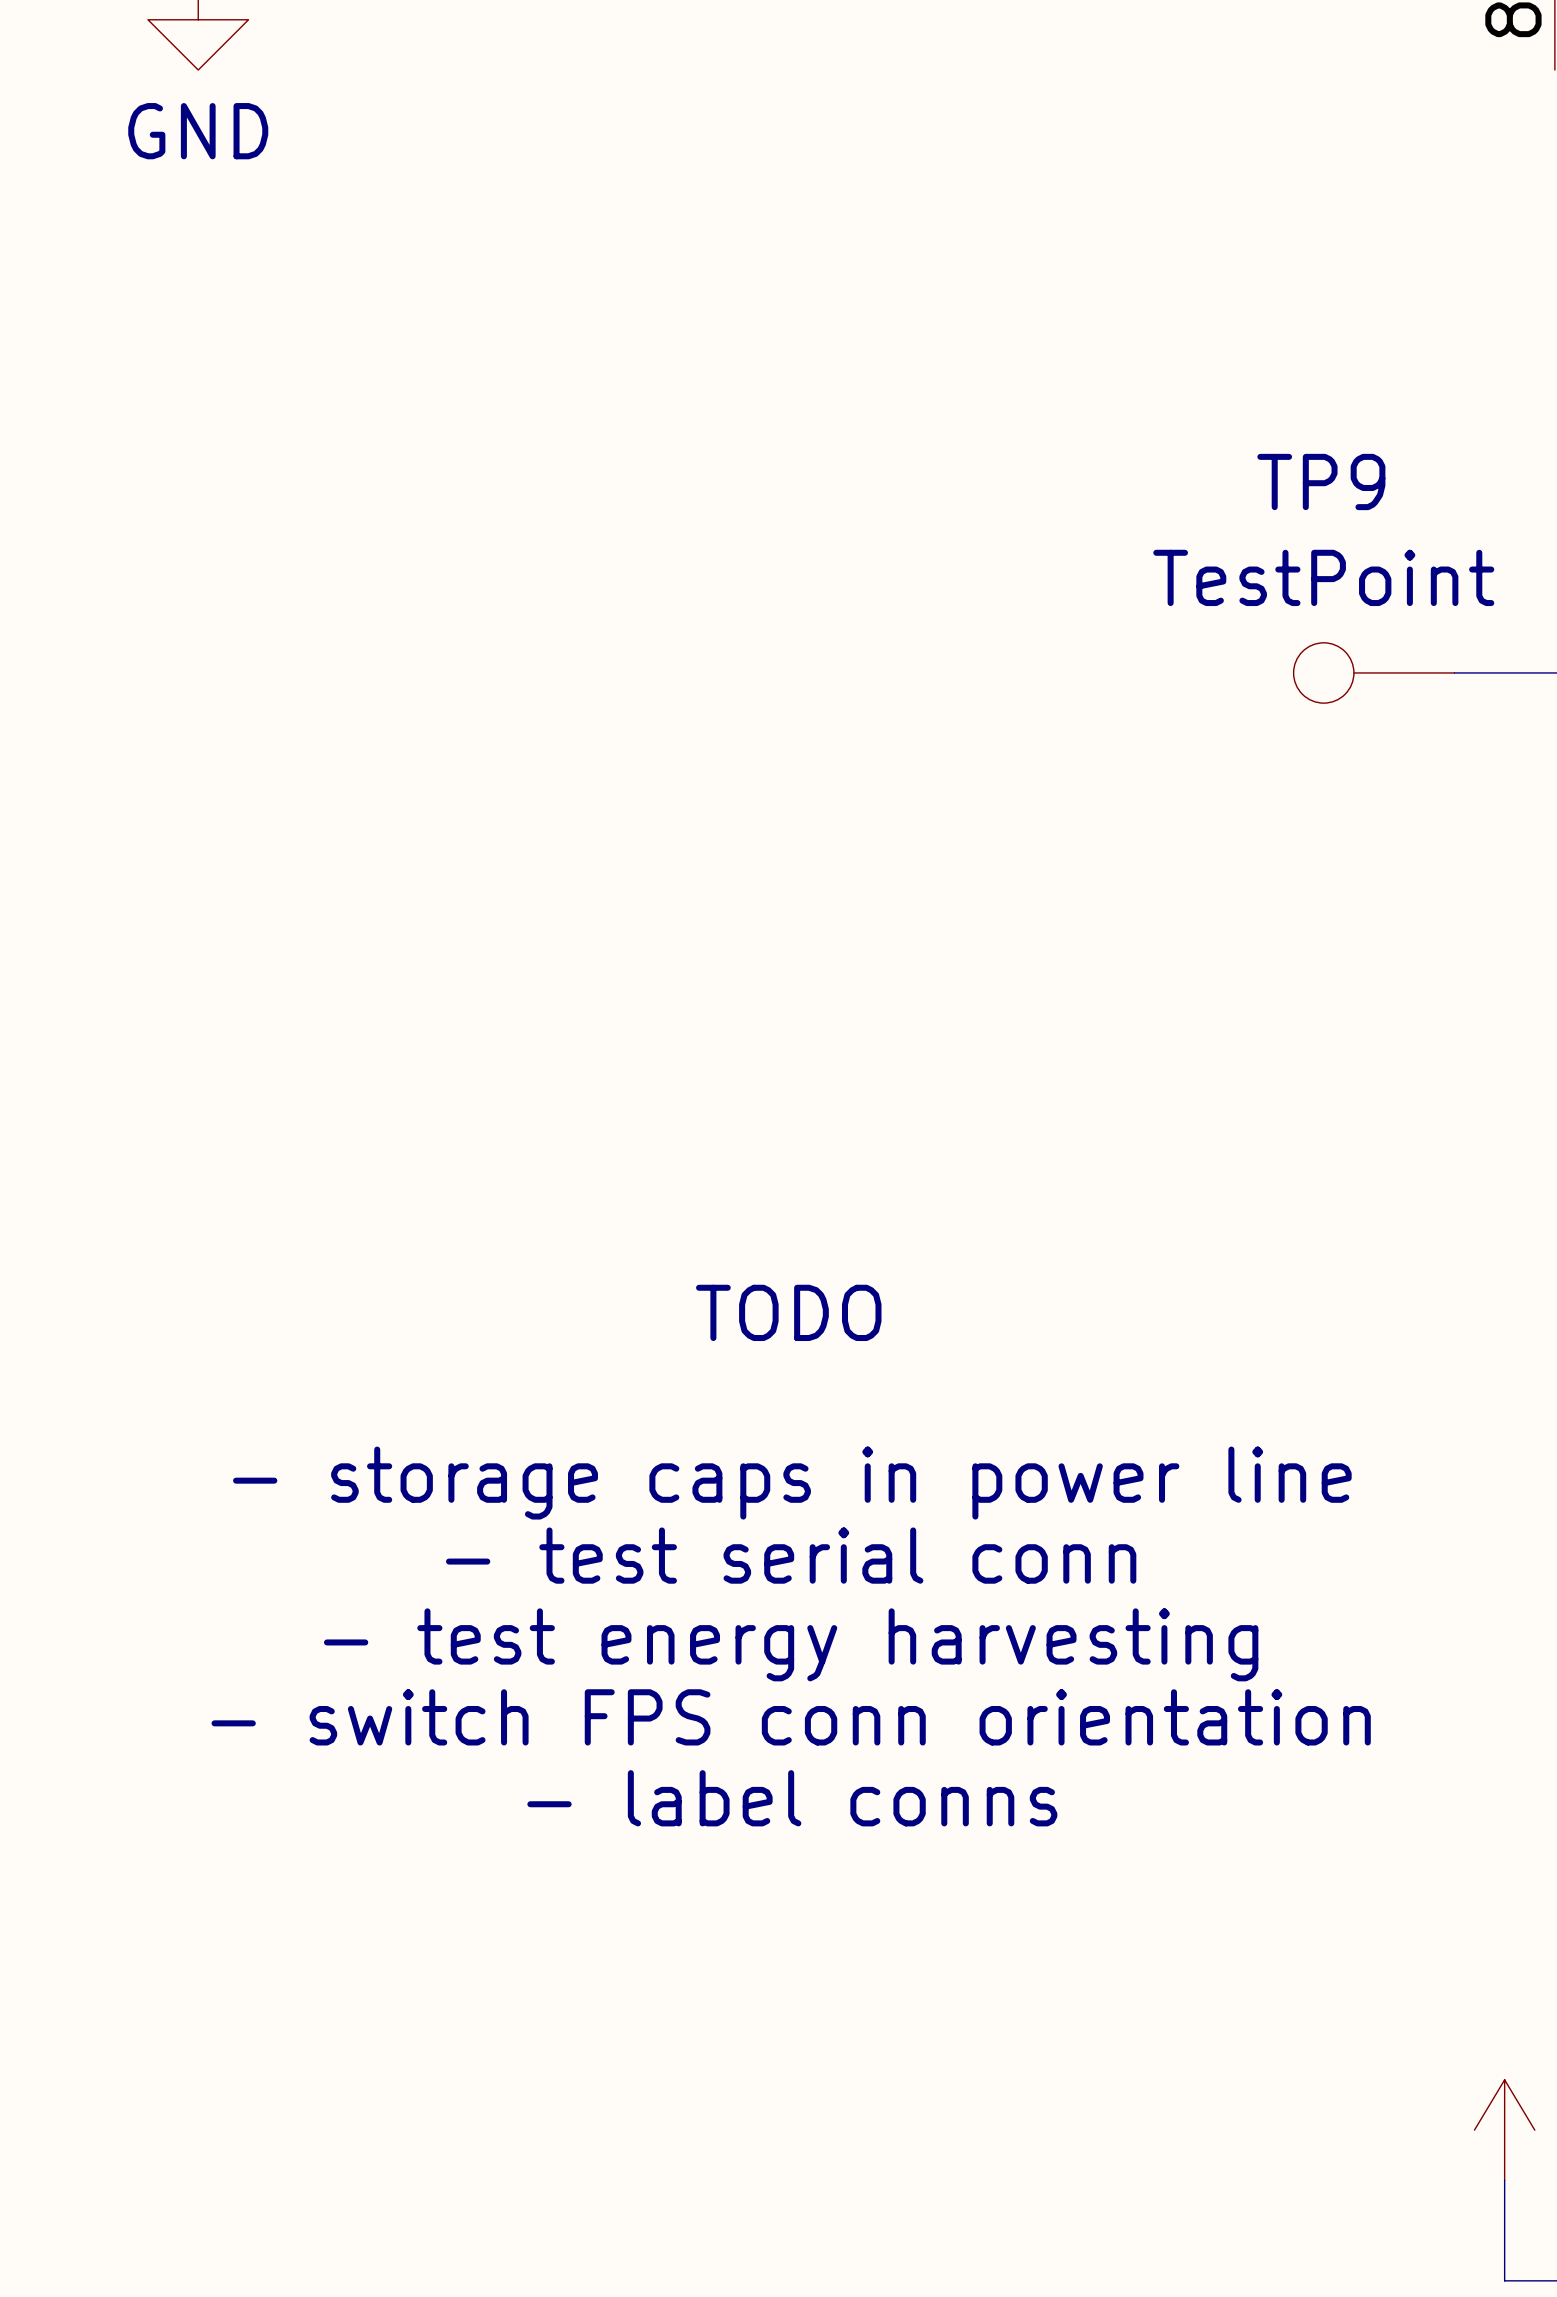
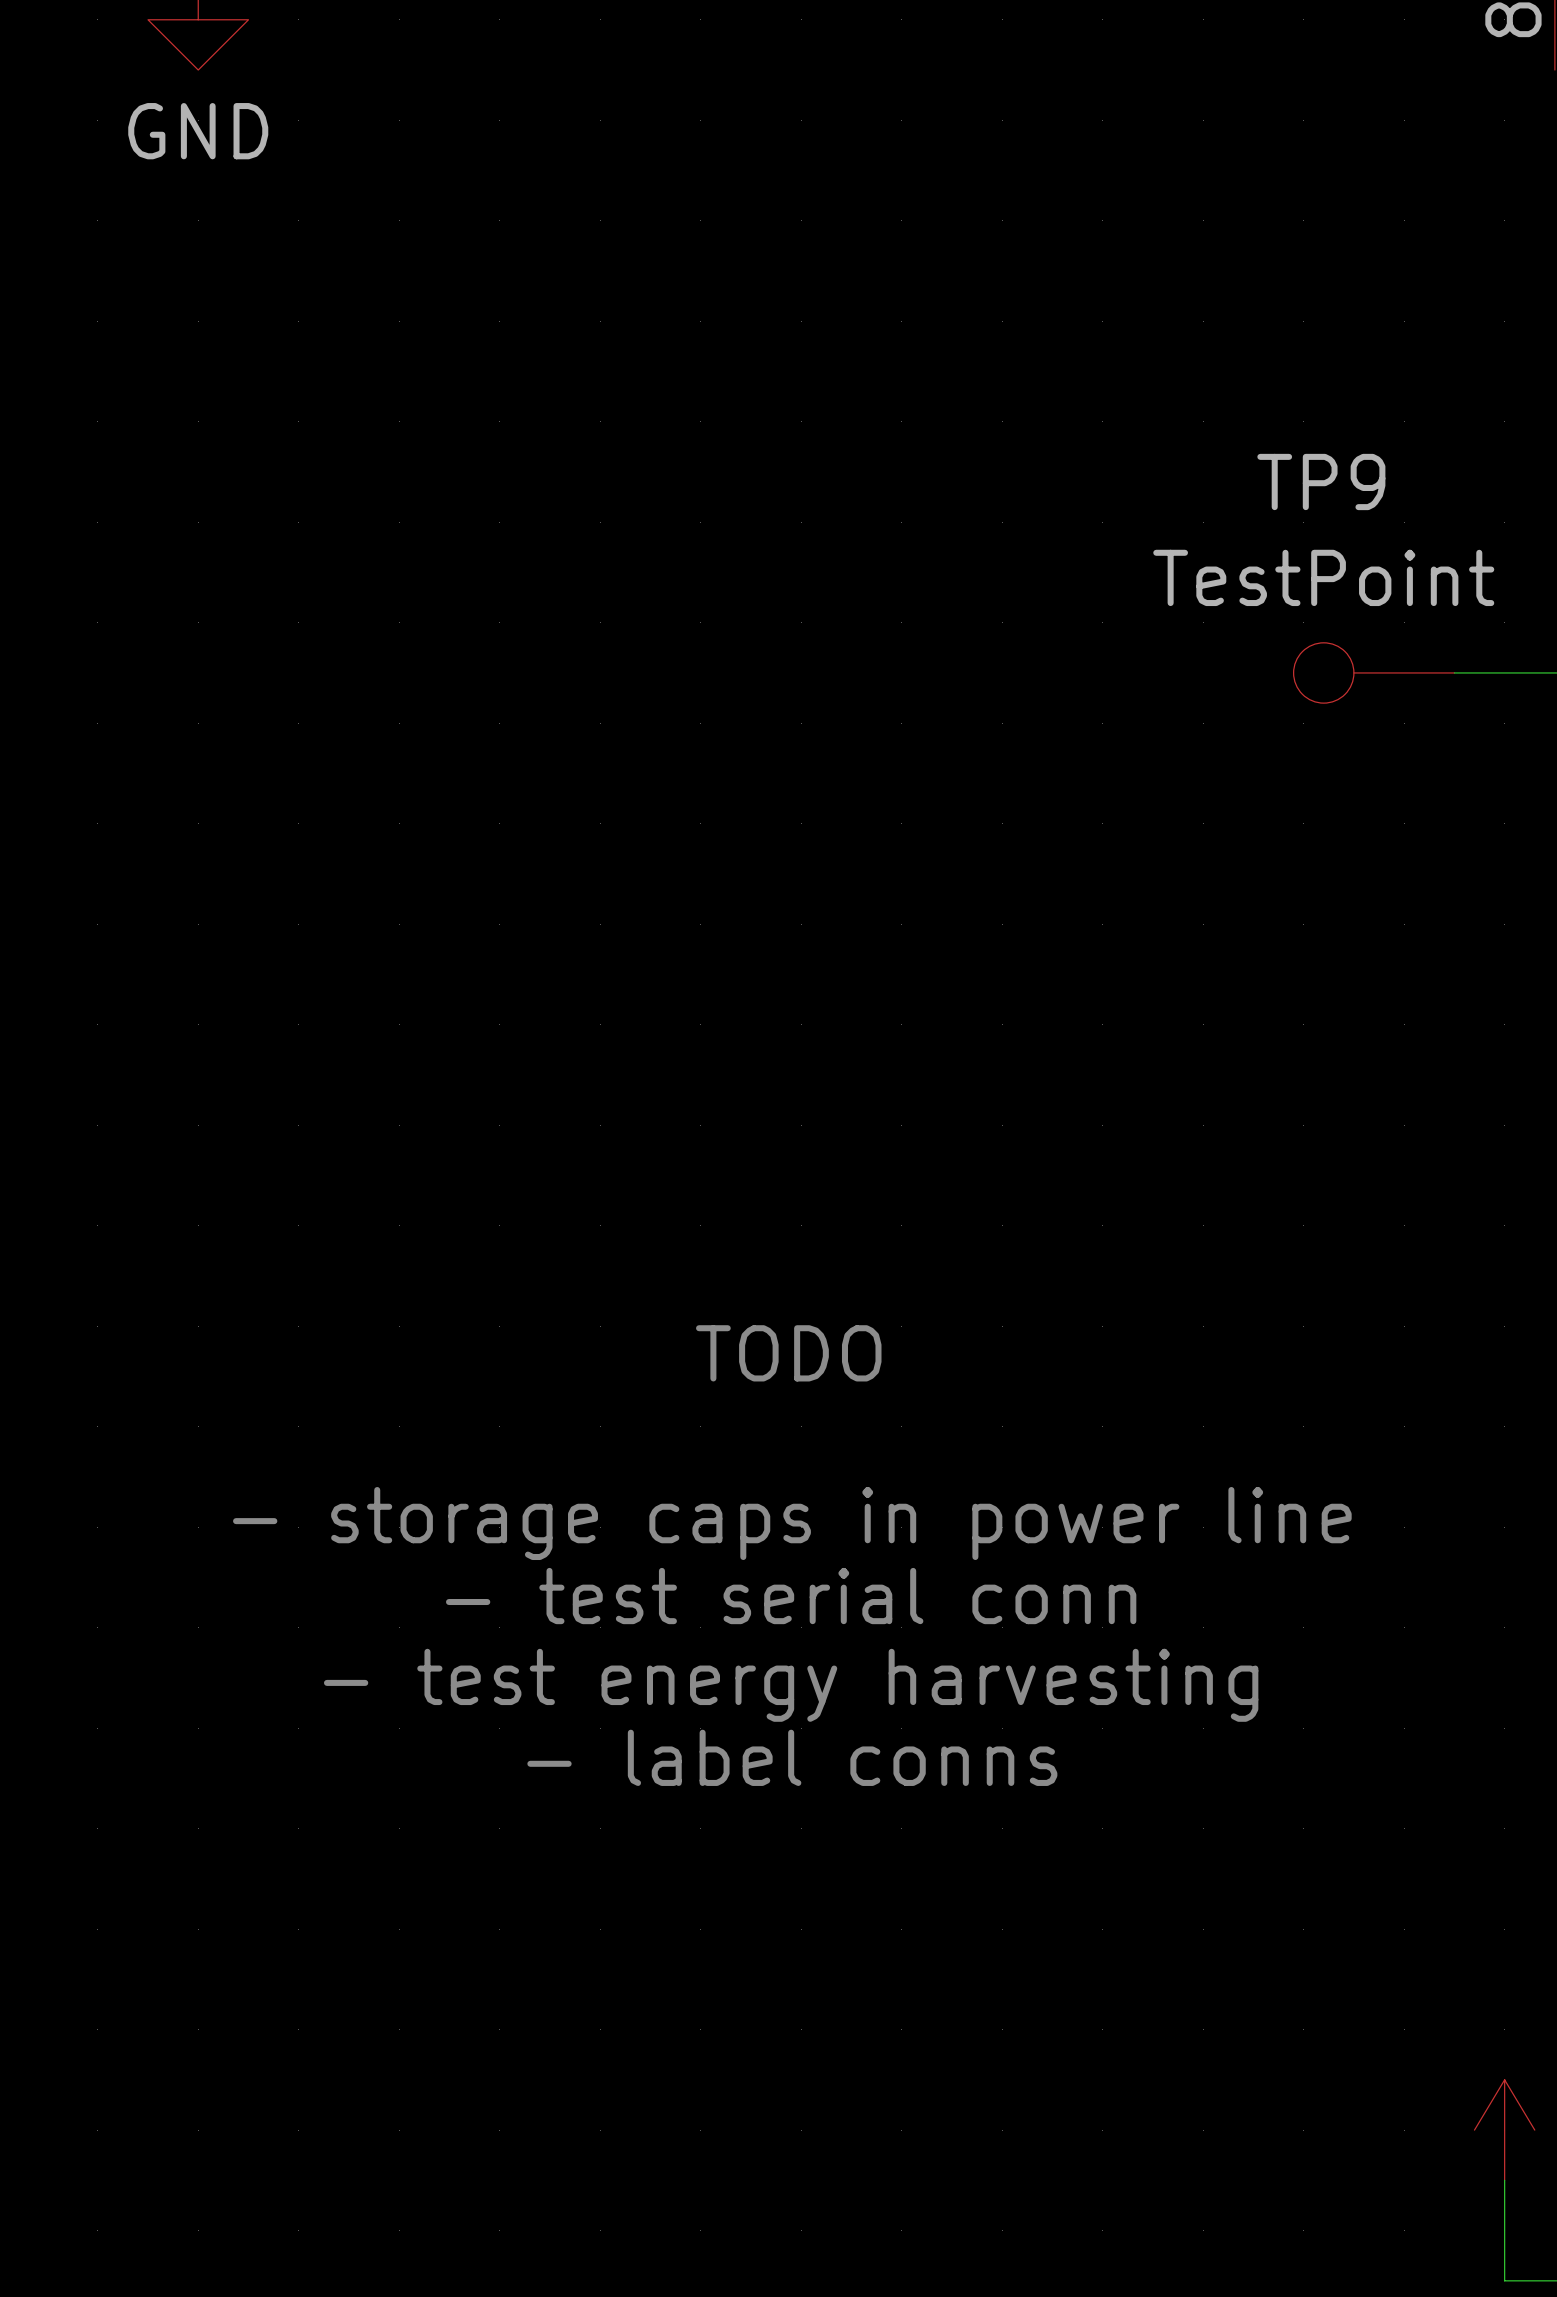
text position: TODO (788, 1312) -> TODO (788, 1353)
text position: - storage caps in power line (792, 1483) -> - storage caps in power line (792, 1523)
text position: - test serial conn (791, 1555) -> - test serial conn (791, 1596)
text position: - test energy harvesting (791, 1644) -> - test energy harvesting (791, 1685)
text: - switch FPS conn orientation (791, 1717) -> none
text position: - label conns (792, 1798) -> - label conns (792, 1757)

